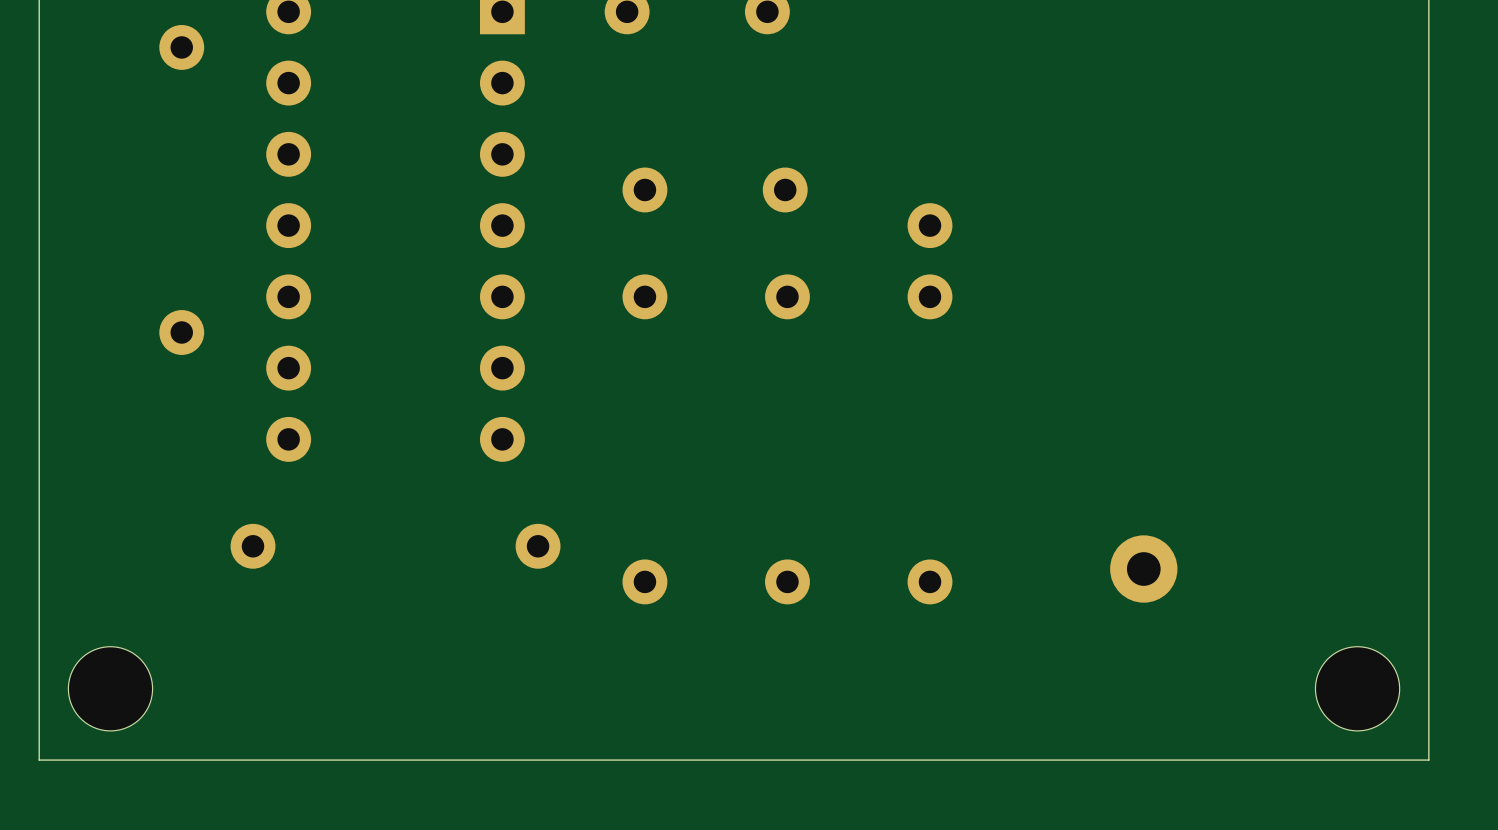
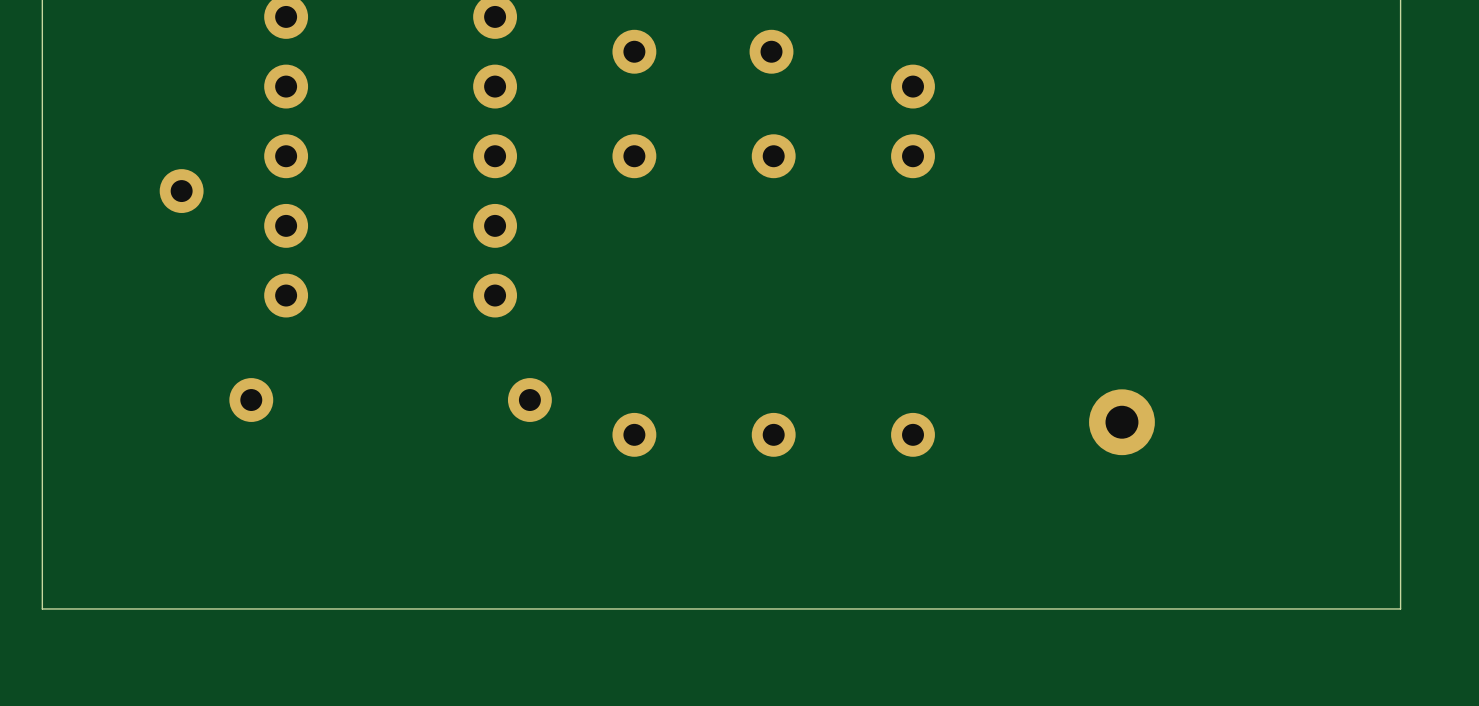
part: (110, 688) -> none
part: (1357, 688) -> none

